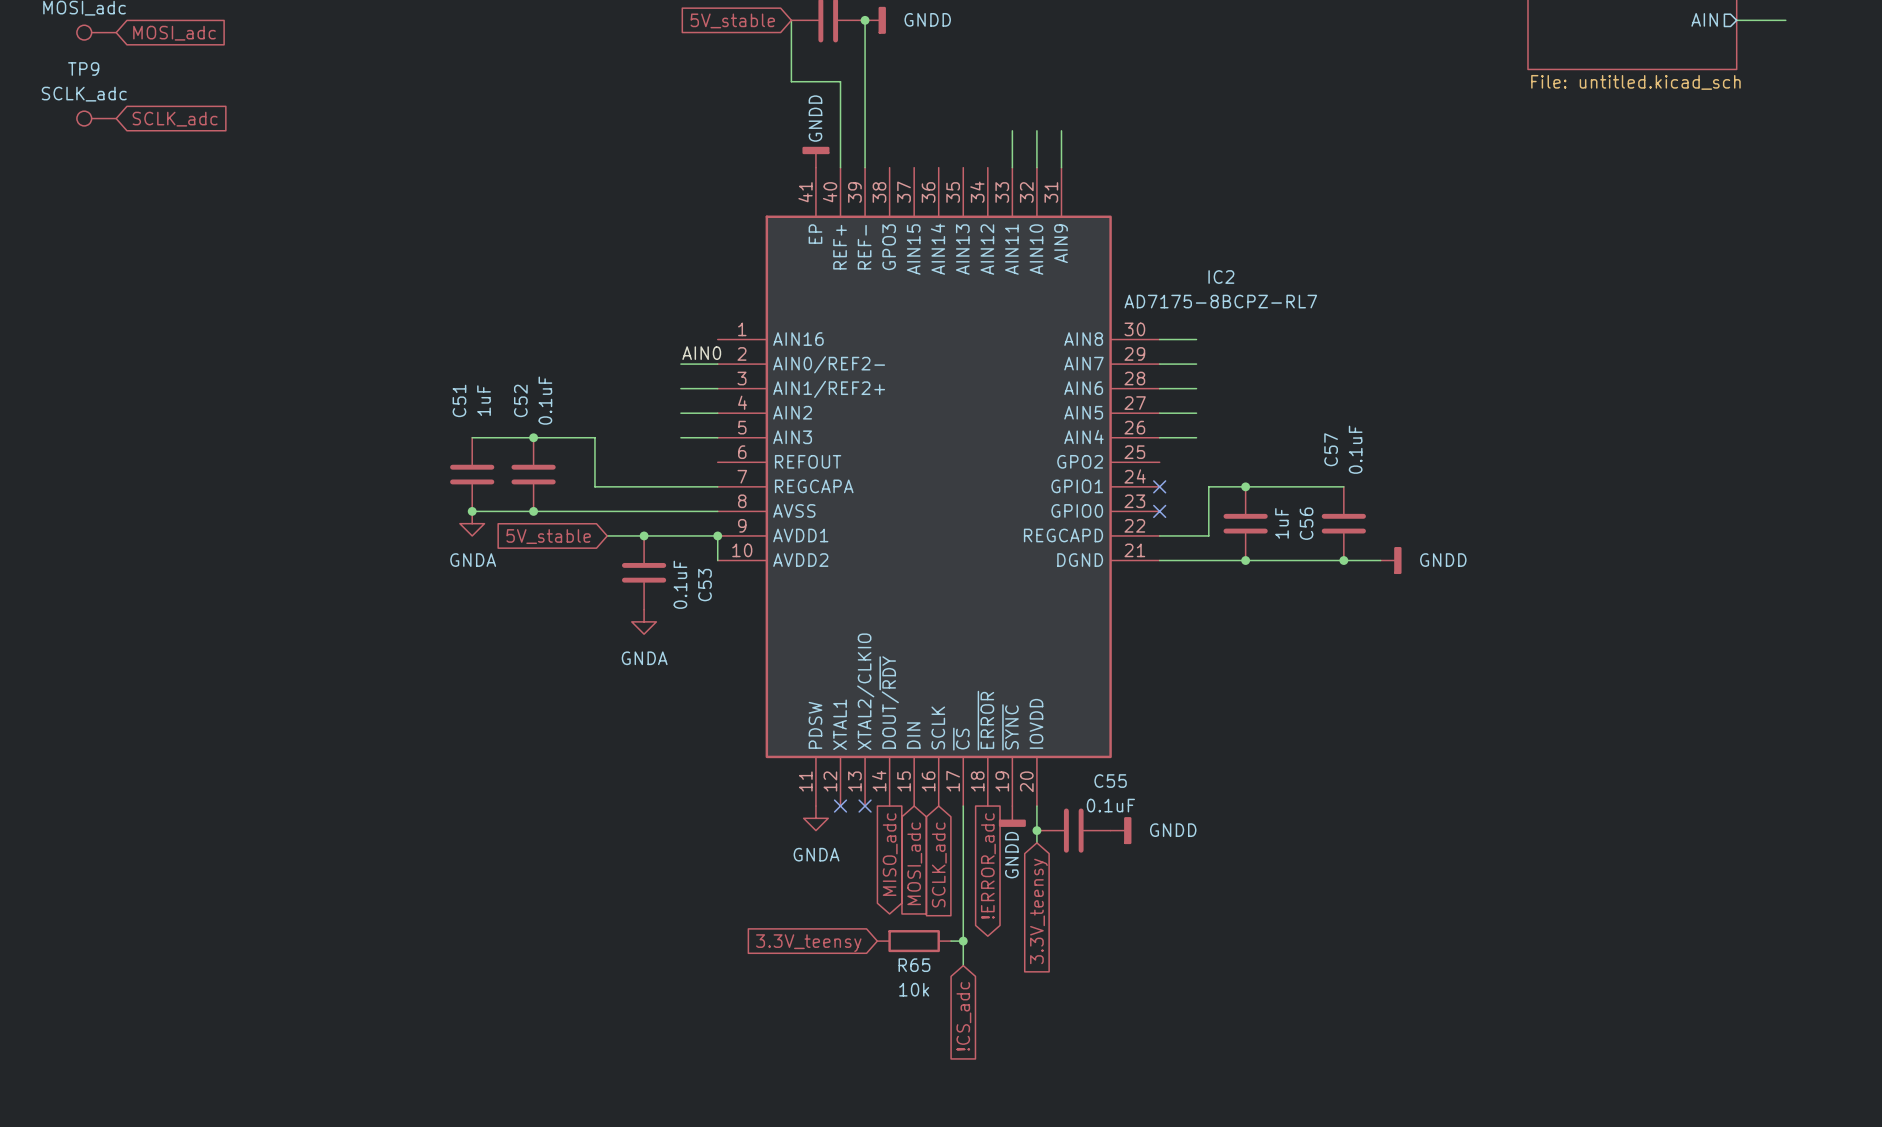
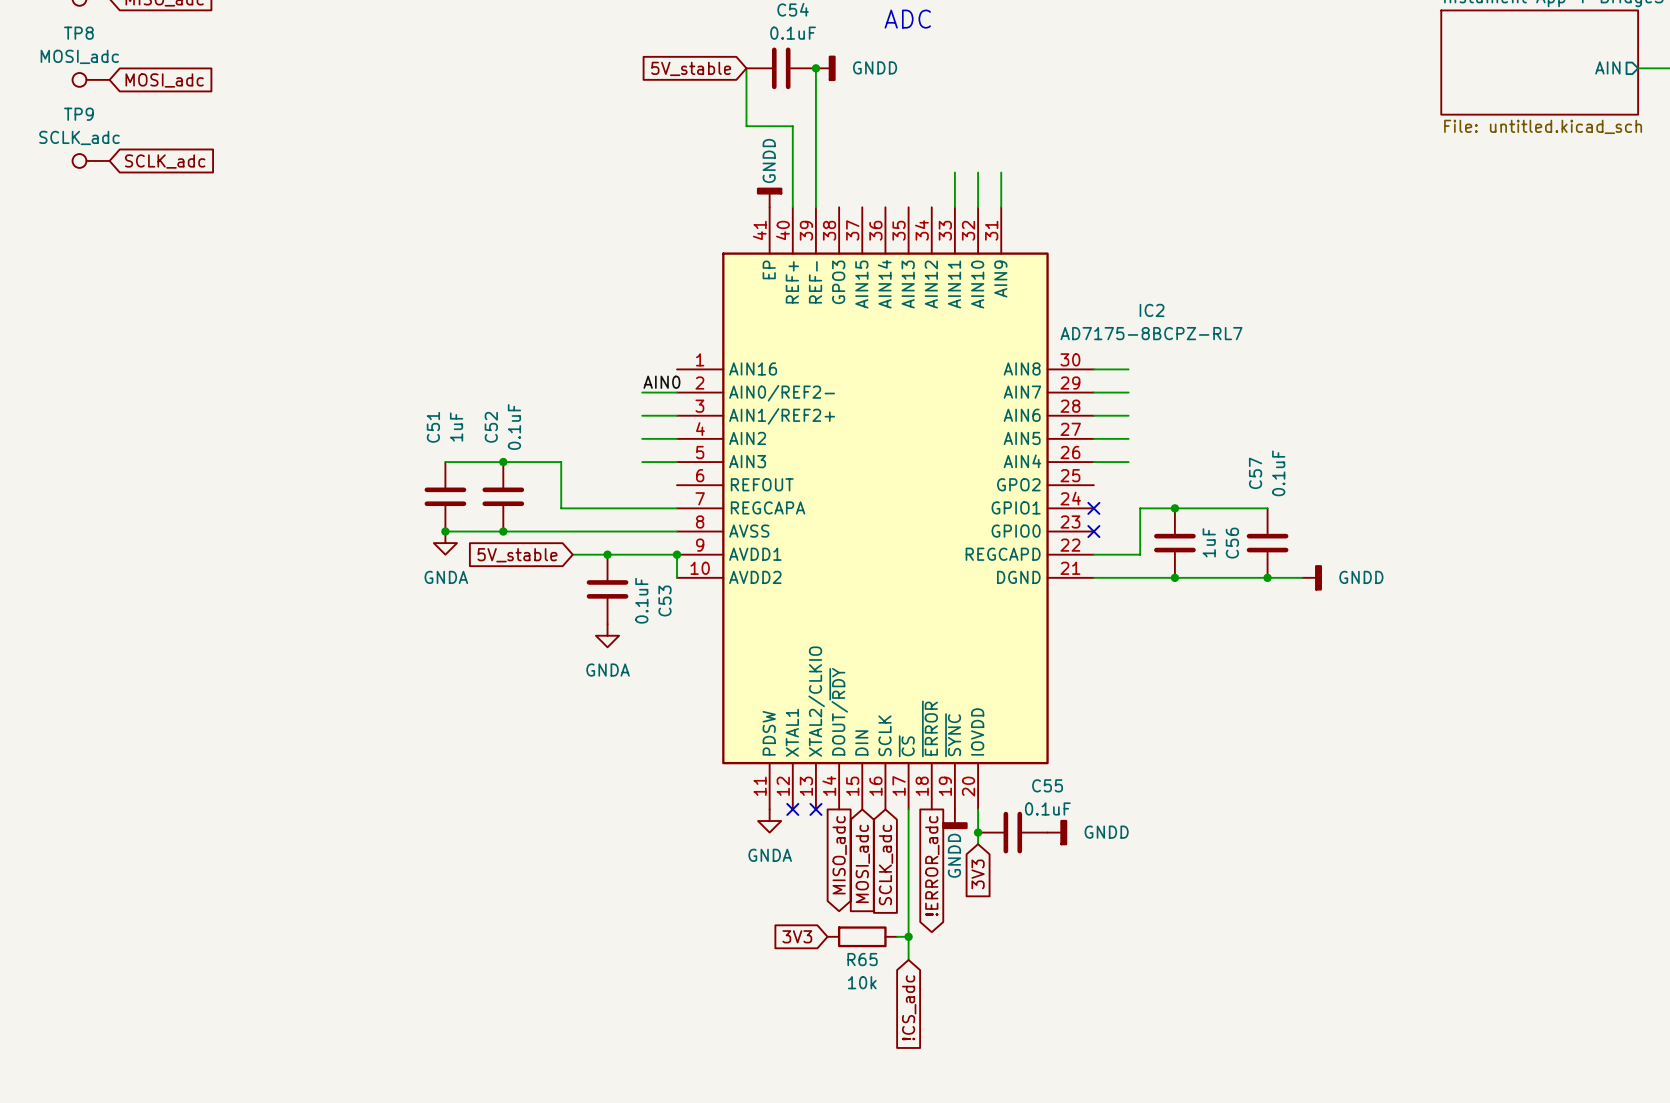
global label: 3.3V_teensy (1038, 911) -> 3V3 (978, 874)
global label: 3.3V_teensy (808, 943) -> 3V3 (797, 936)

